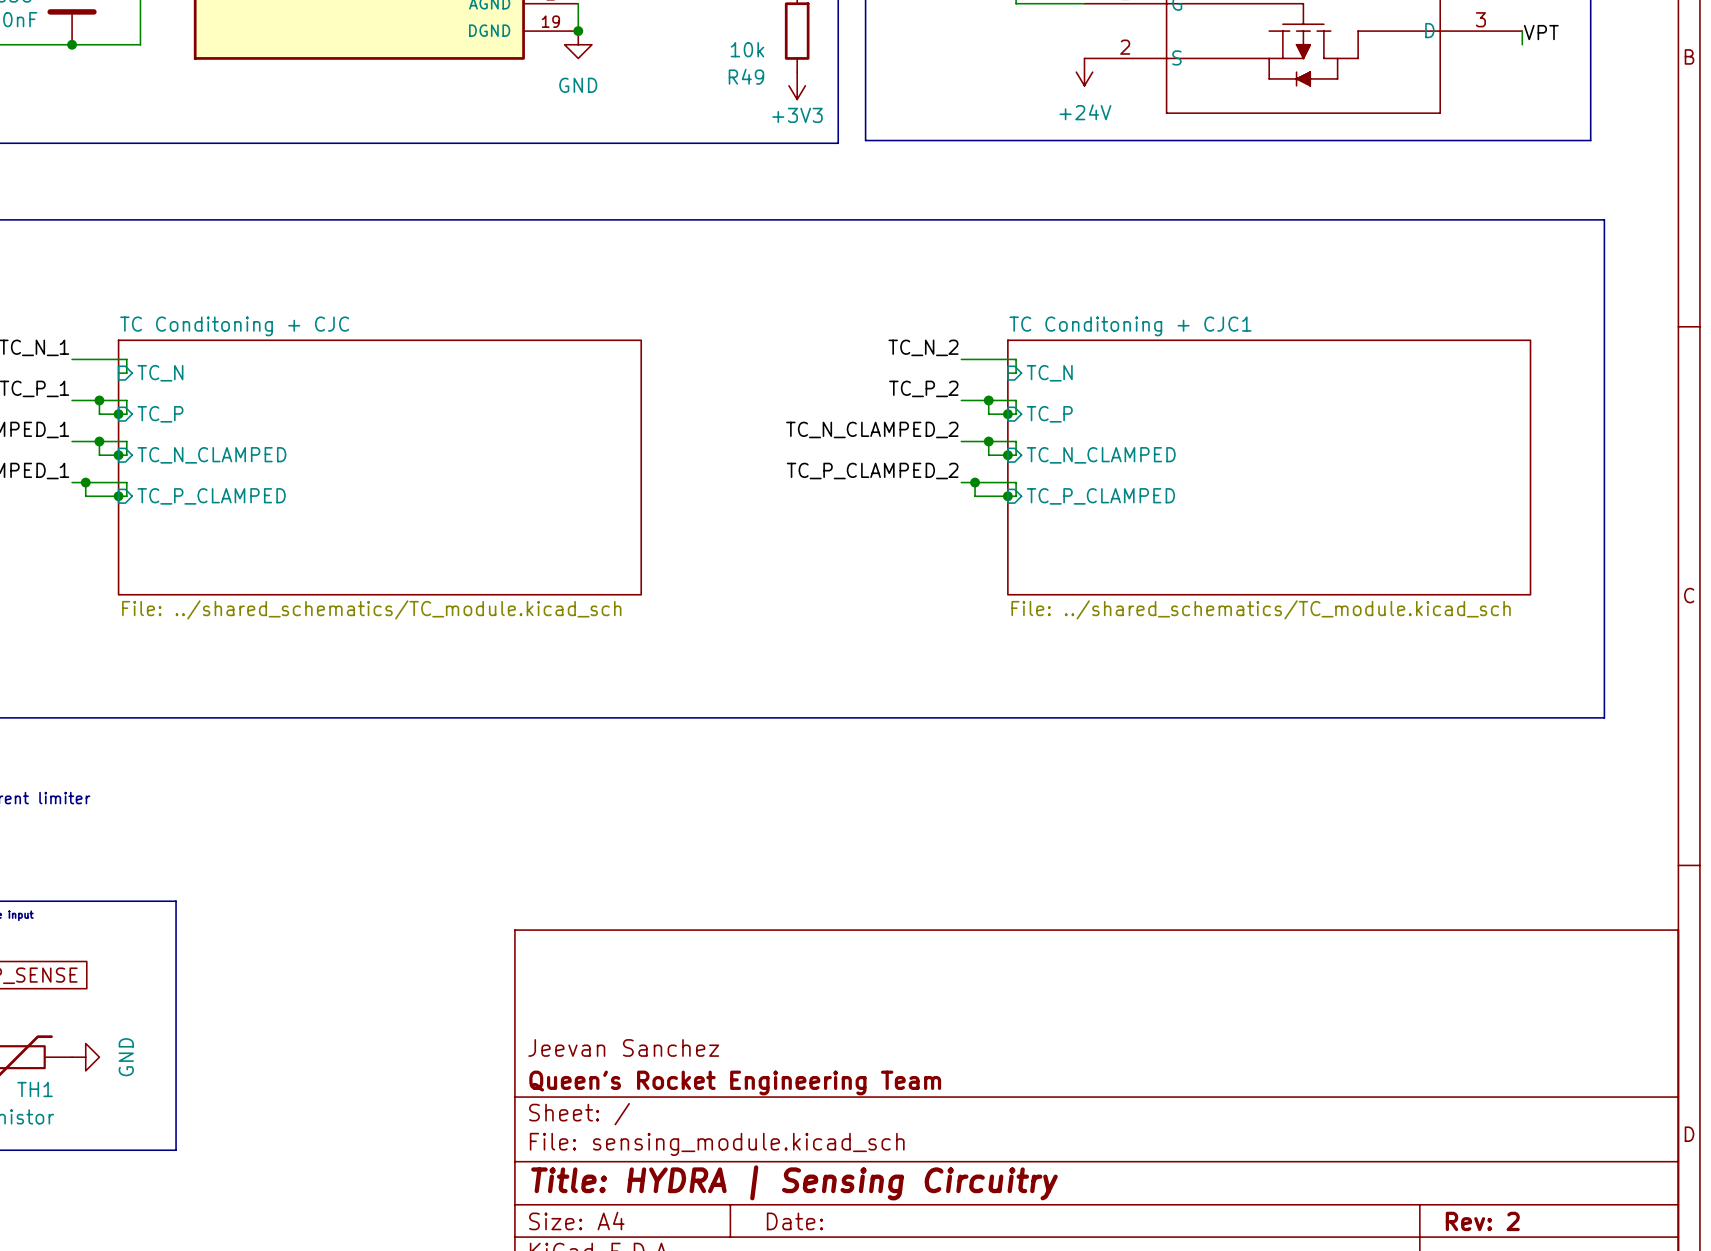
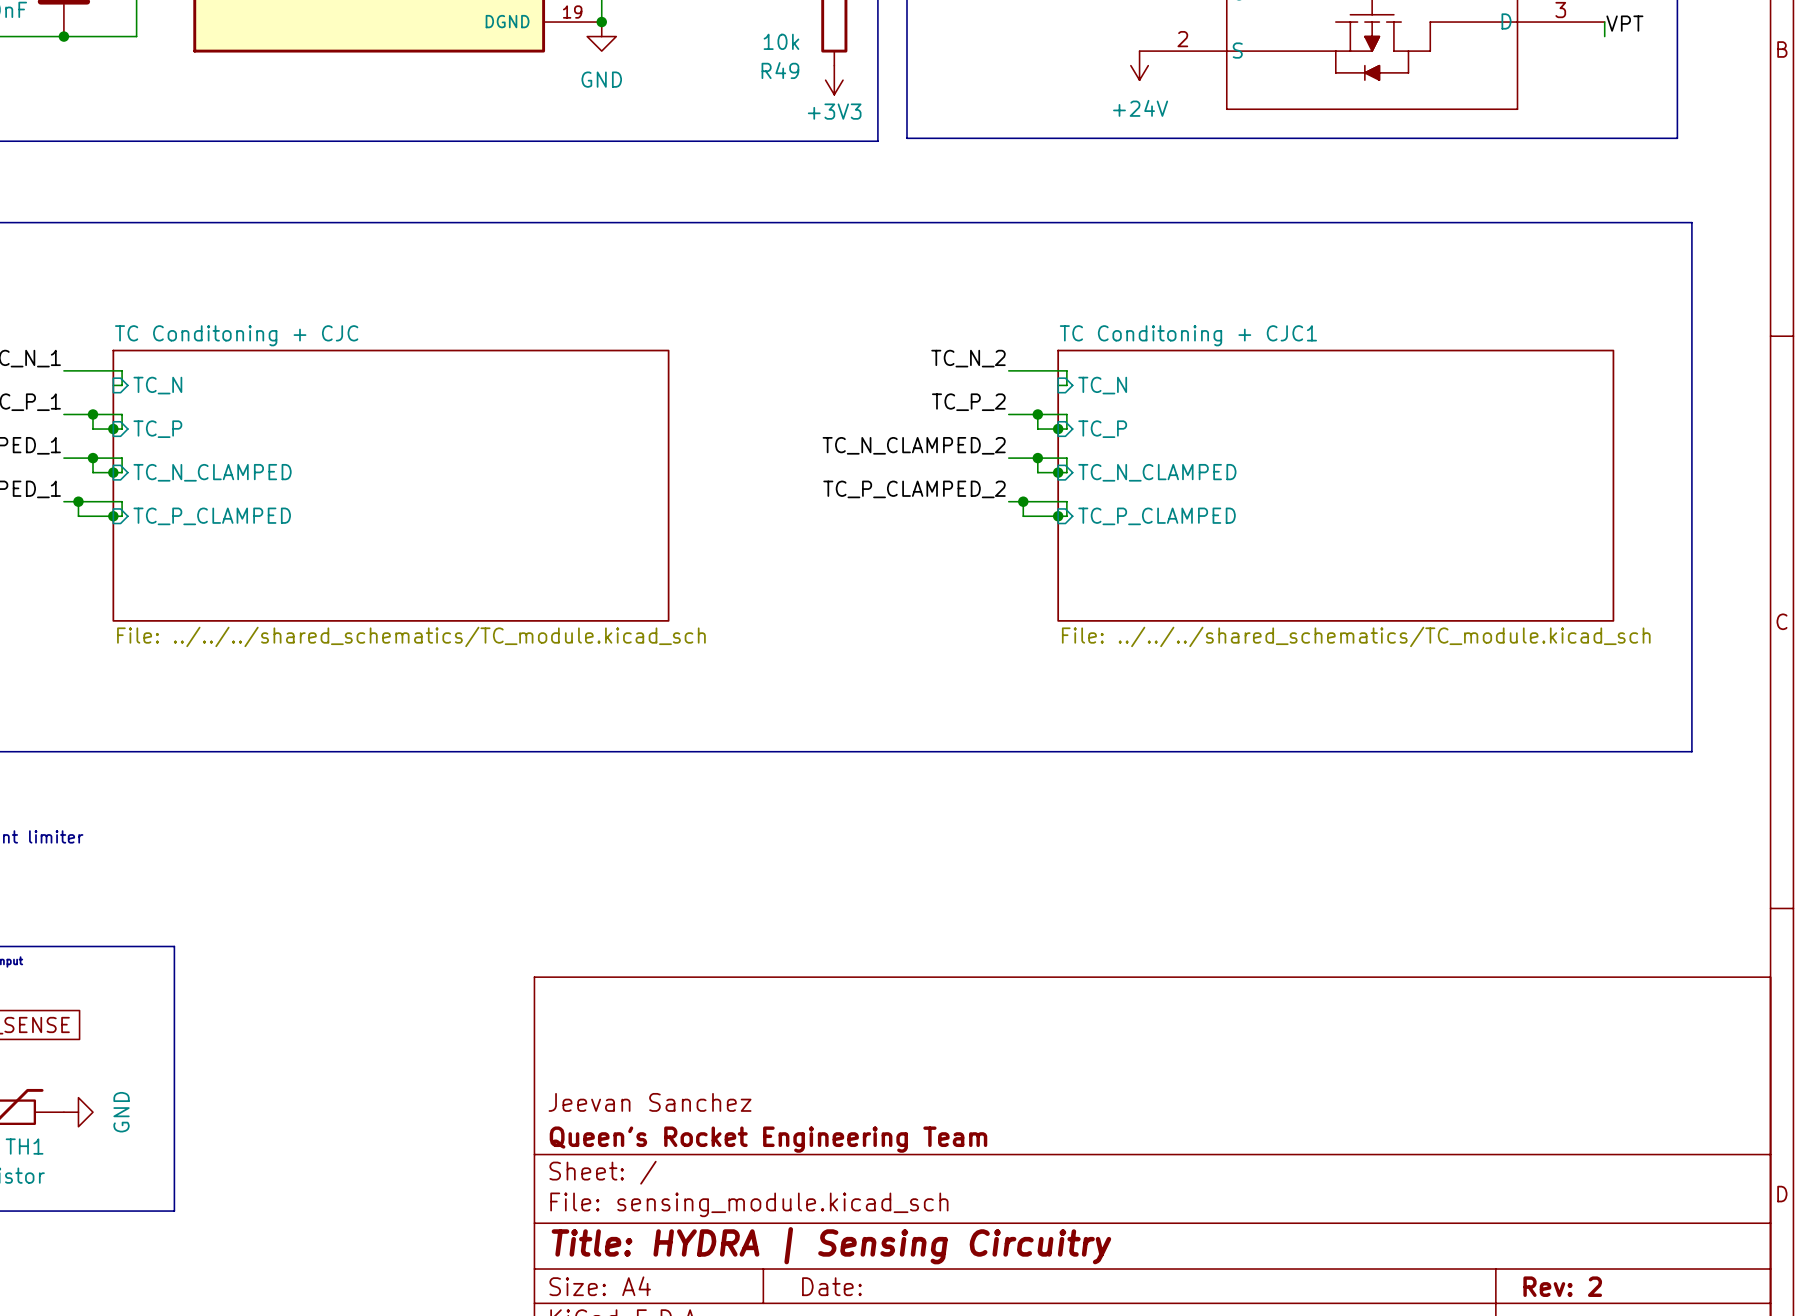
sheet TC Conditoning + CJC value: File: ../shared_schematics/TC_module.kicad_sch (371, 609) -> File: ../../../shared_schematics/TC_module.kicad_sch (411, 636)
sheet TC Conditoning + CJC1 value: File: ../shared_schematics/TC_module.kicad_sch (1261, 609) -> File: ../../../shared_schematics/TC_module.kicad_sch (1356, 636)

